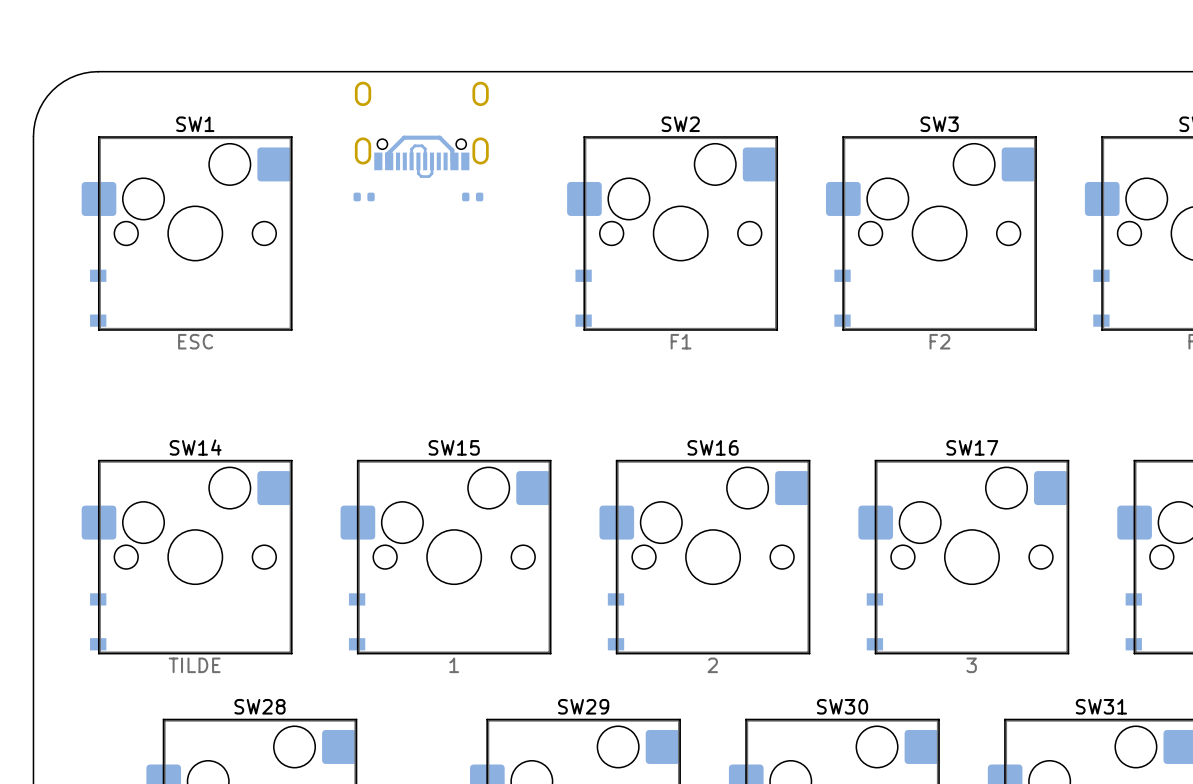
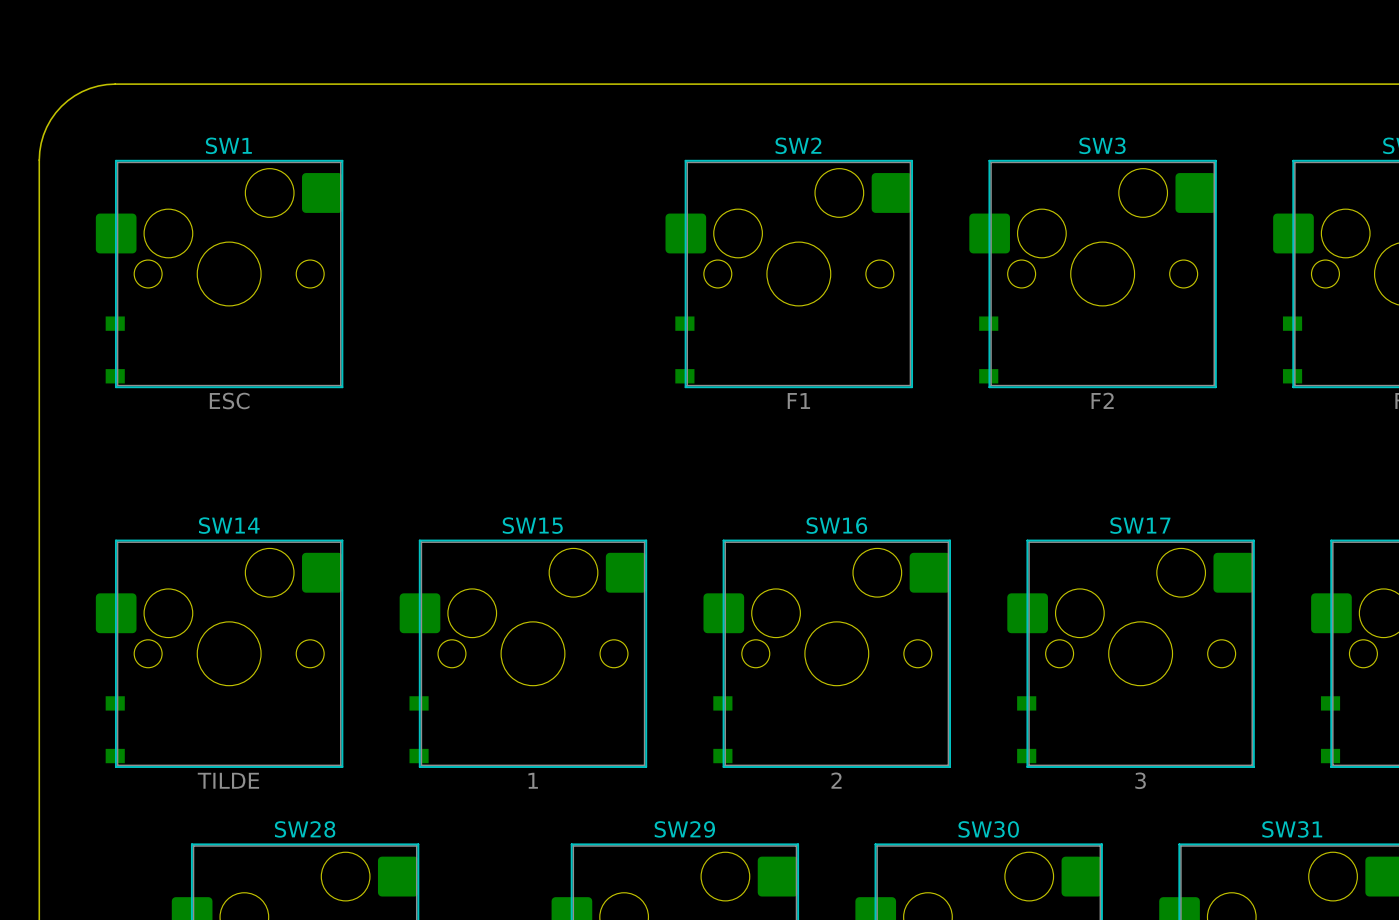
part: (421, 125) -> none
bottom track: (387, 161) (387, 154) (404, 137) (439, 137) (452, 150) (452, 161) -> none
bottom track: (411, 161) (411, 149) (414, 145) (422, 145) (425, 148) (425, 161) -> none
bottom track: (418, 161) (418, 173) (421, 176) (429, 176) (432, 173) (432, 161) -> none
part: (364, 196) -> none
part: (472, 196) -> none

